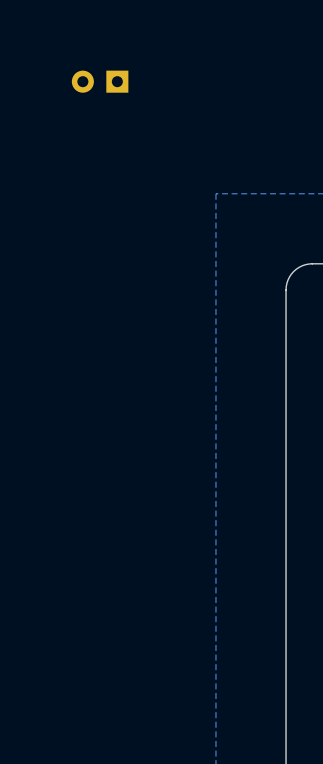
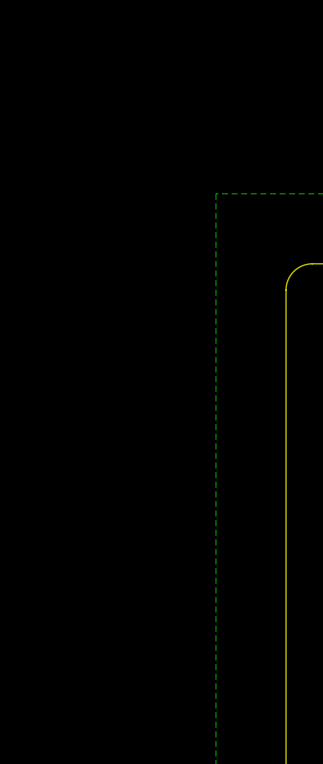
part: (100, 81) -> none

